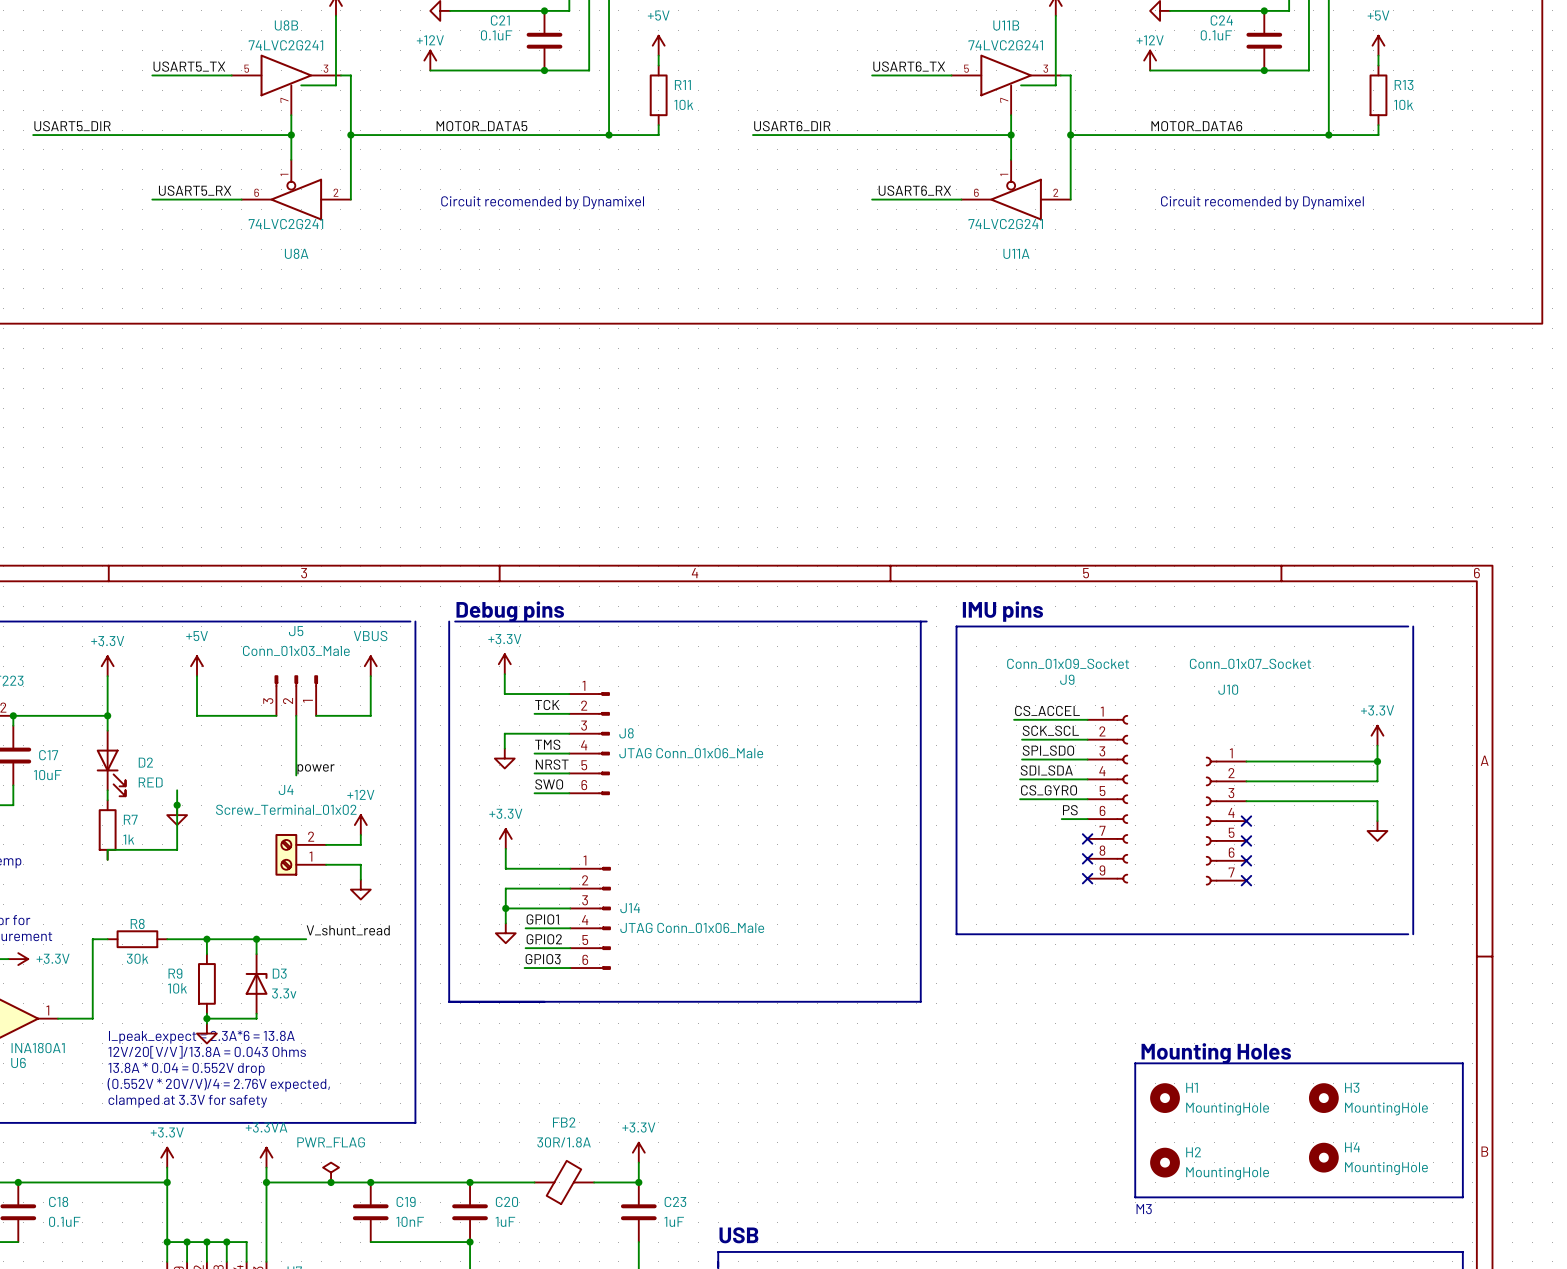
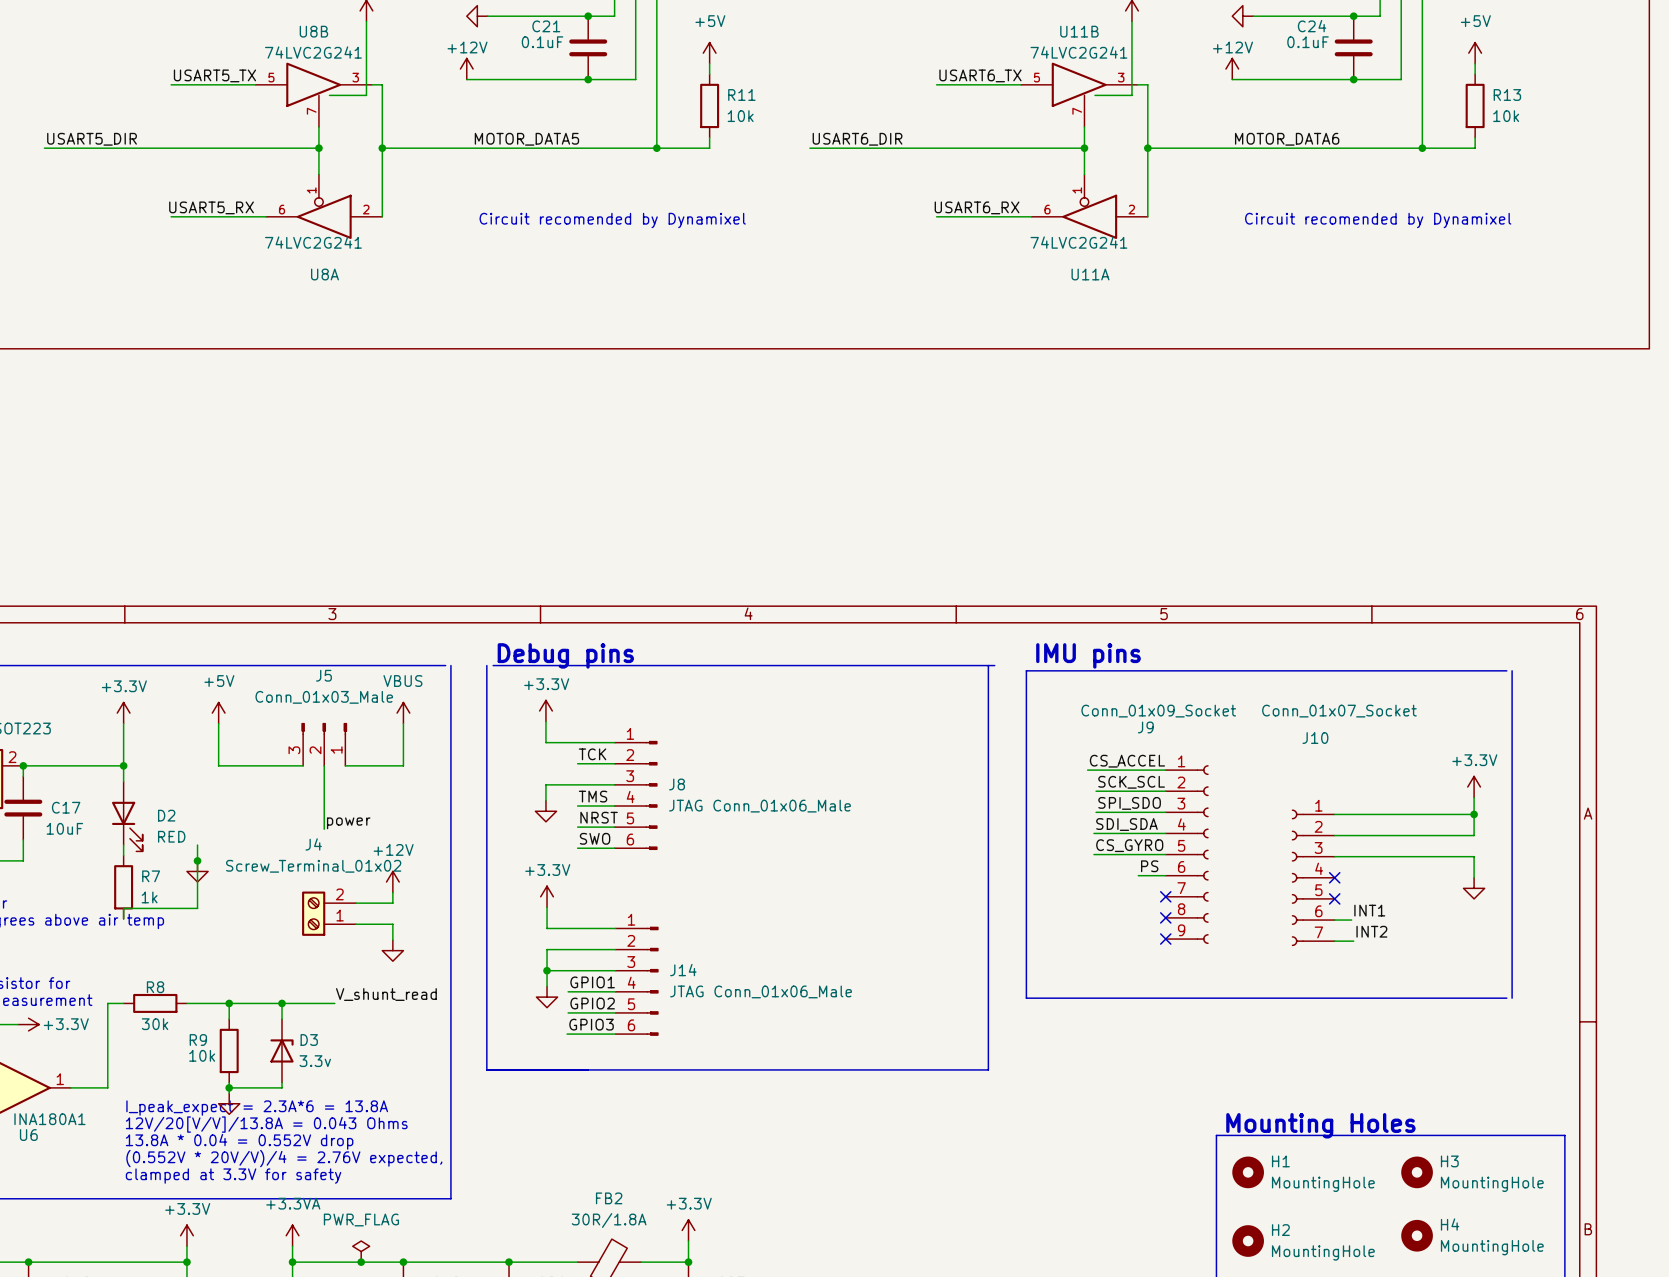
label: none -> INT1 (1369, 910)
wire: none -> (1334, 920) (1351, 920)
no-connect mark: (1246, 860) -> none
label: none -> INT2 (1371, 931)
wire: none -> (1334, 941) (1353, 941)
no-connect mark: (1246, 880) -> none

